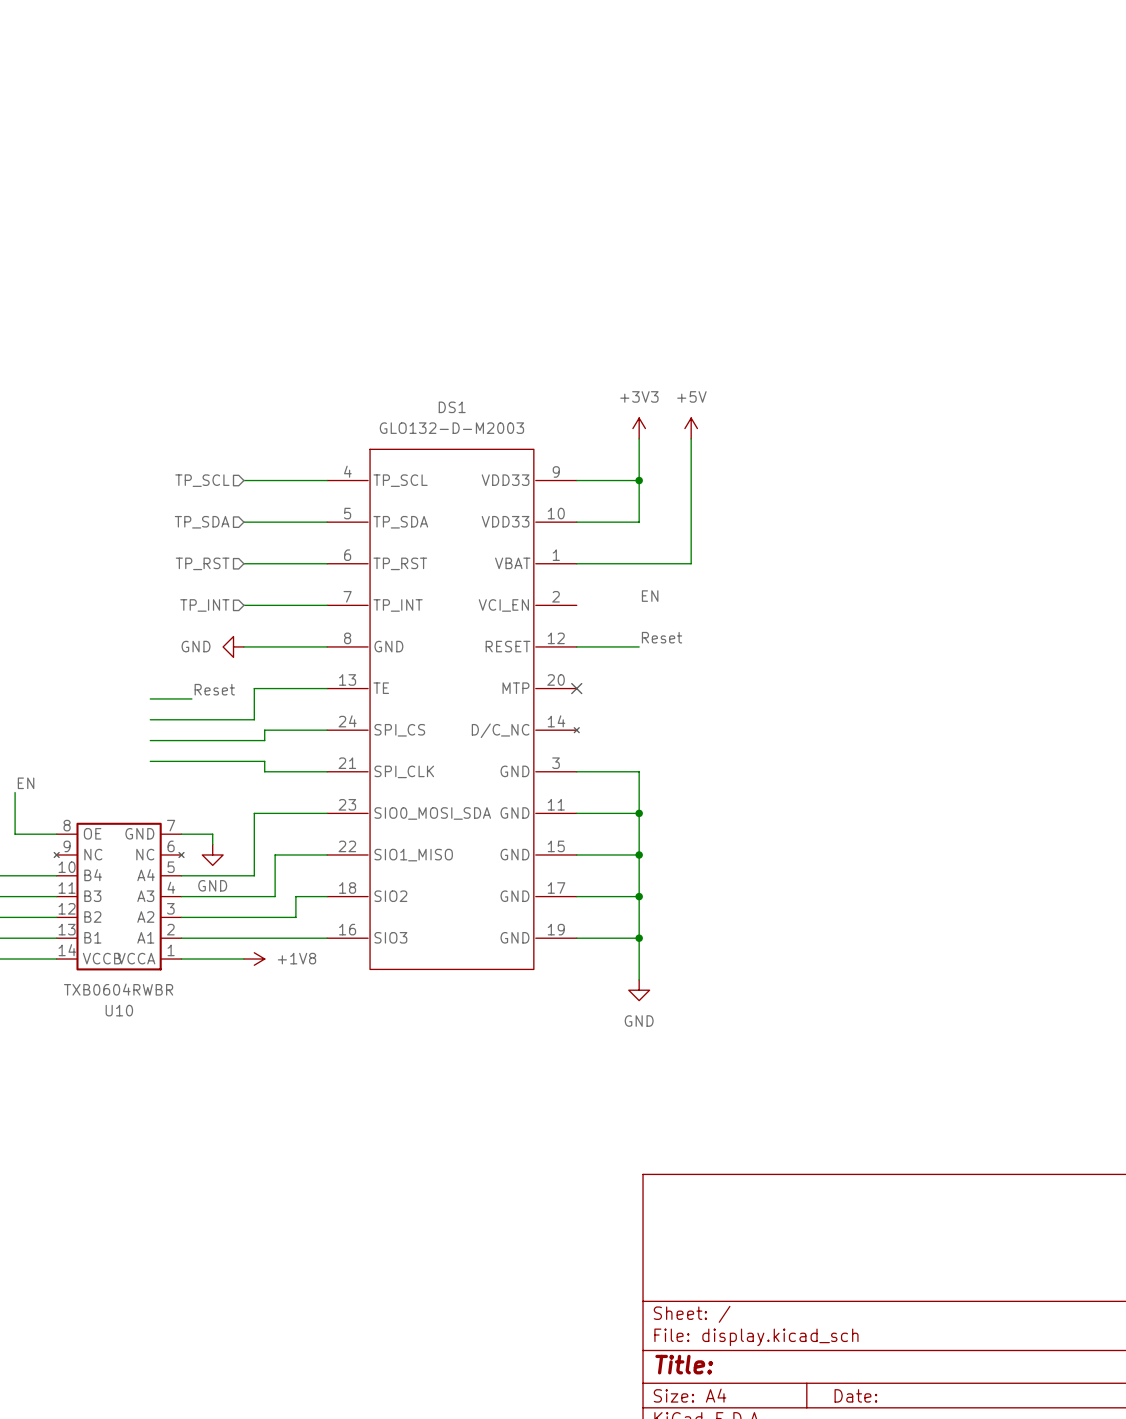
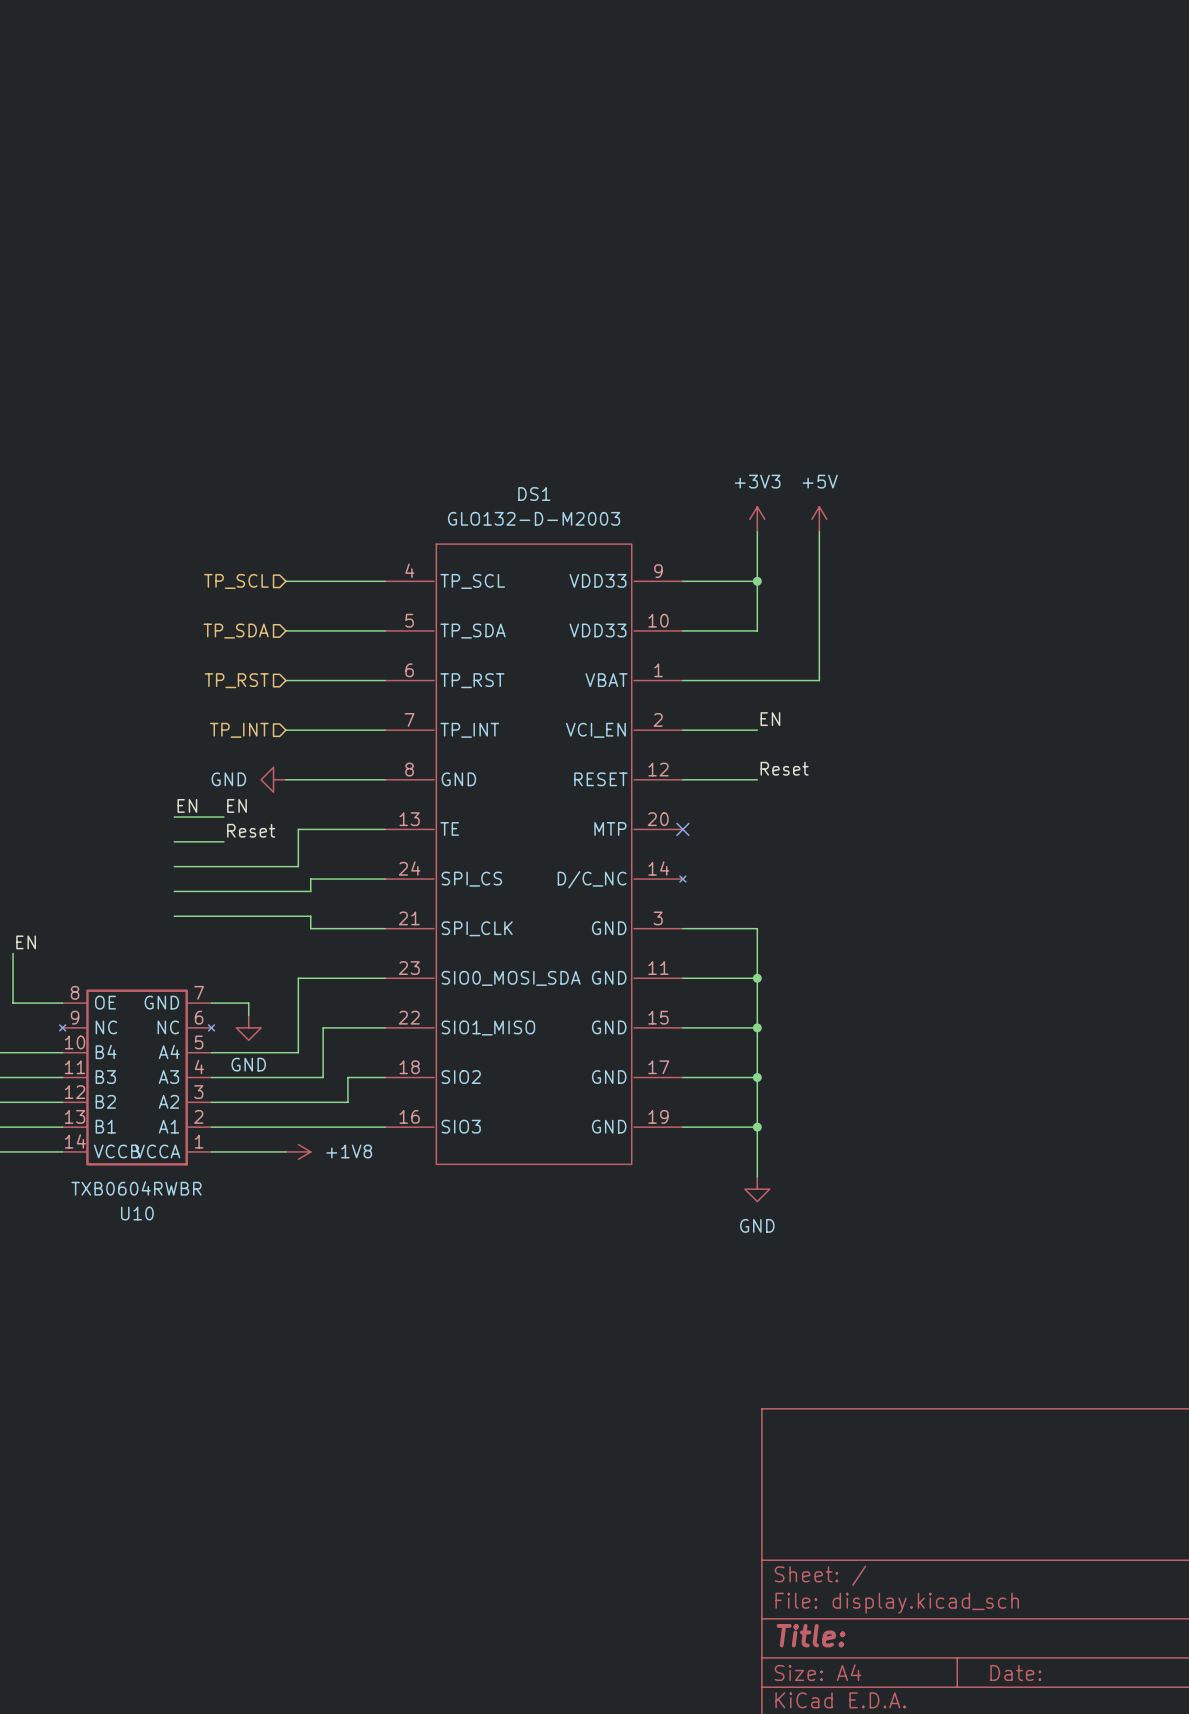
wire: none -> (682, 730) (757, 730)
label: none -> EN (187, 805)
label: none -> EN (237, 805)
wire: none -> (174, 817) (223, 817)

